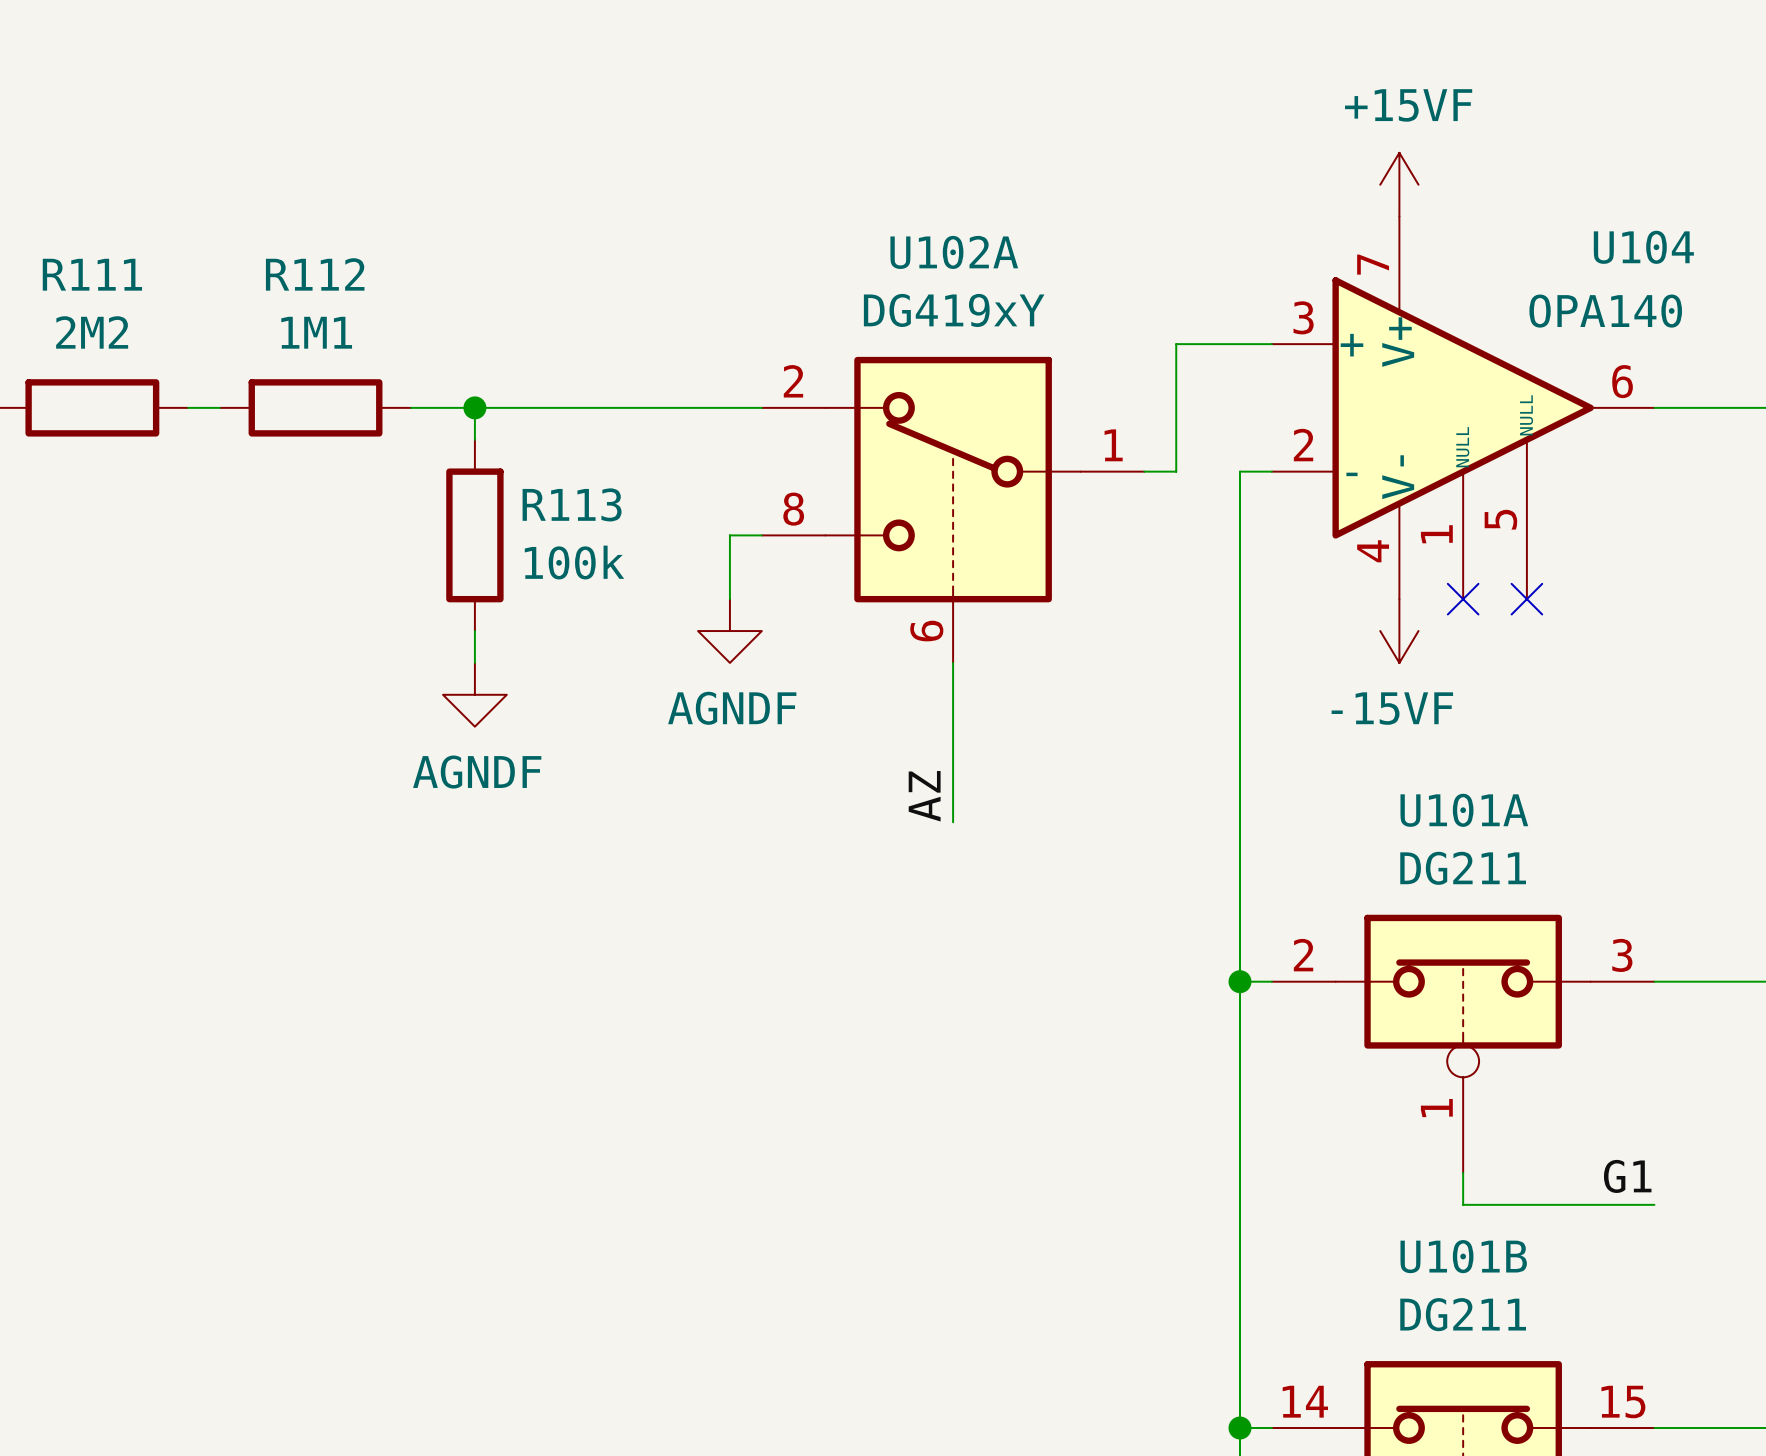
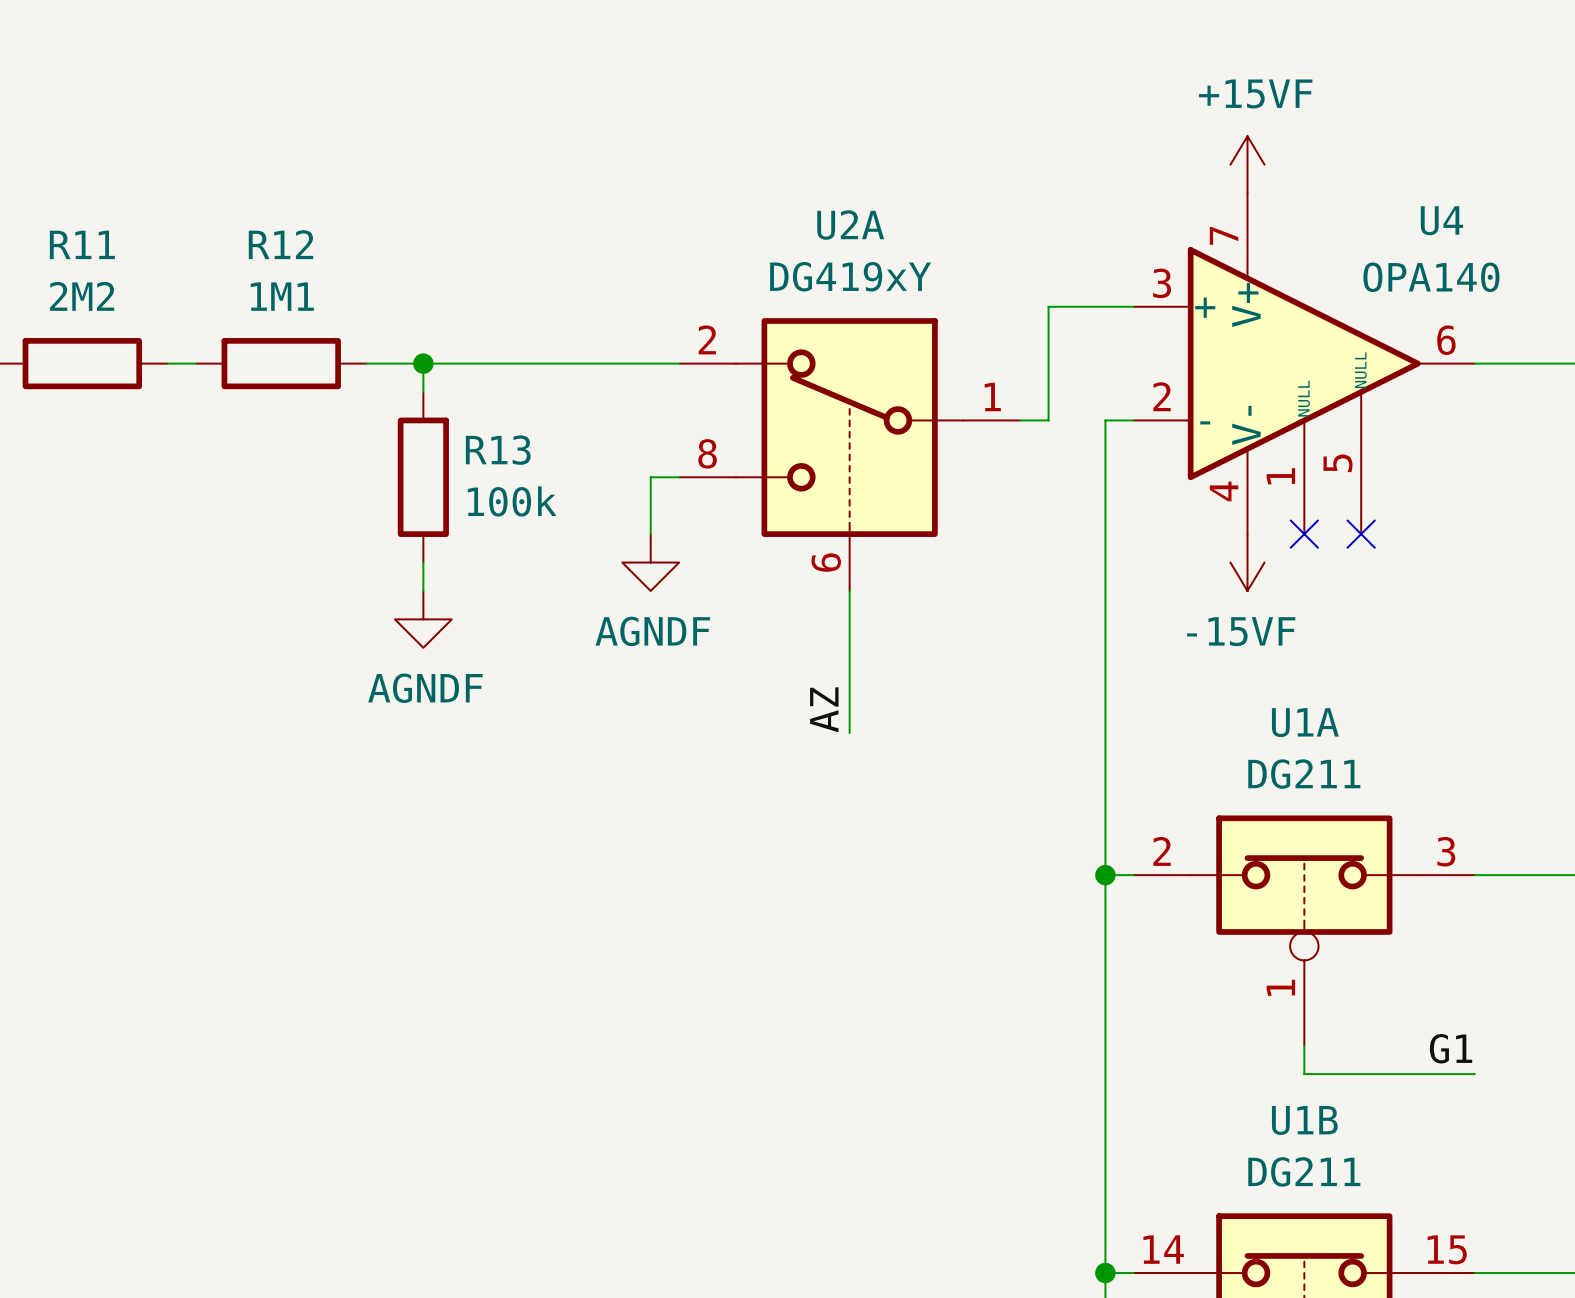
U104 name: U104 (1643, 247) -> U4 (1441, 220)
U102A name: U102A (954, 252) -> U2A (850, 225)
R111 name: R111 (92, 274) -> R11 (82, 244)
R112 name: R112 (315, 274) -> R12 (280, 244)
R113 name: R113 (572, 504) -> R13 (498, 450)
U101A name: U101A (1464, 810) -> U1A (1305, 722)
U101B name: U101B (1463, 1256) -> U1B (1304, 1120)

